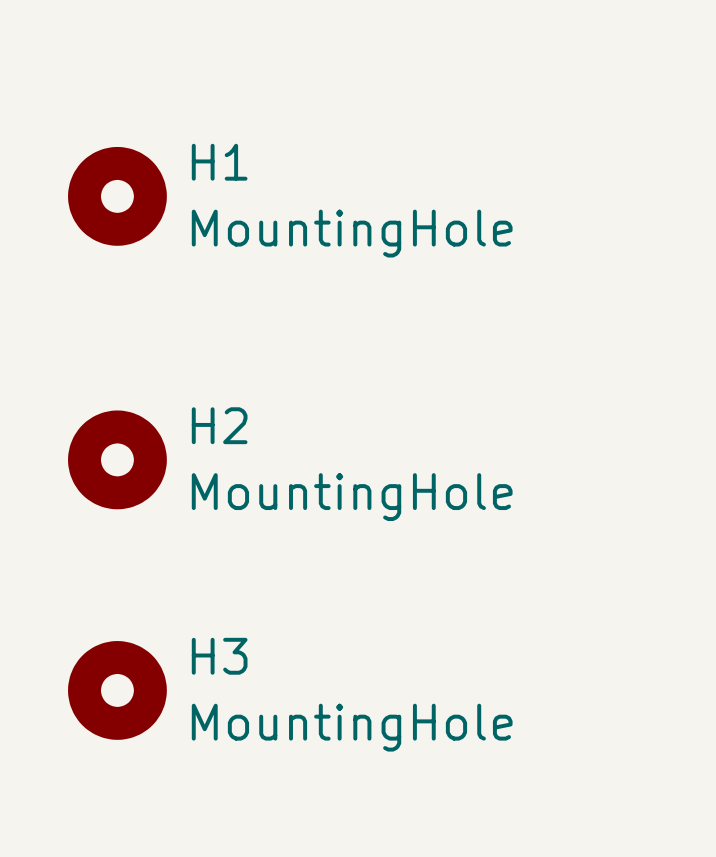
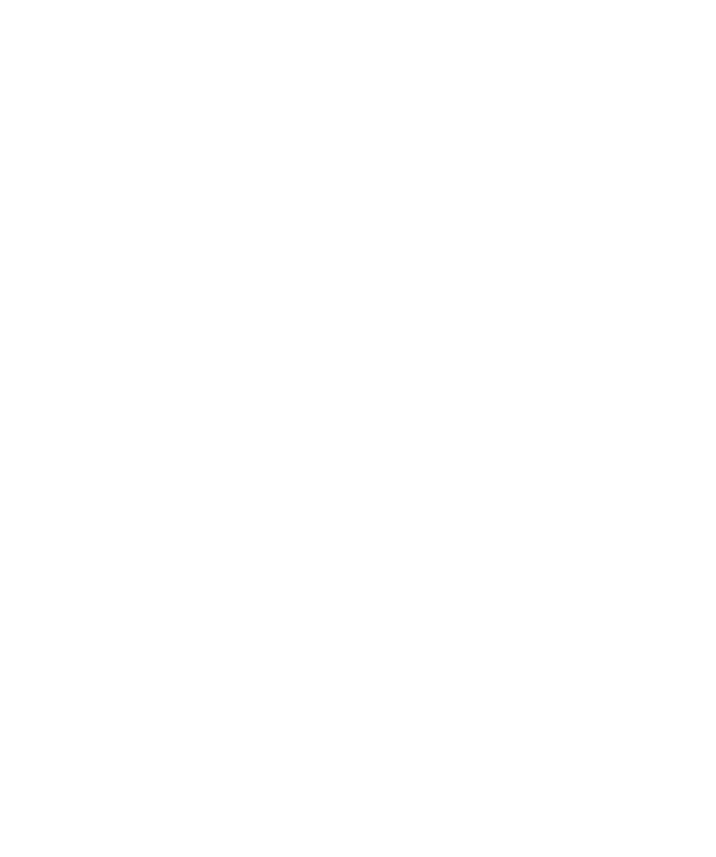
H1: MountingHole (117, 196) -> none
H2: MountingHole (117, 459) -> none
H3: MountingHole (117, 690) -> none

